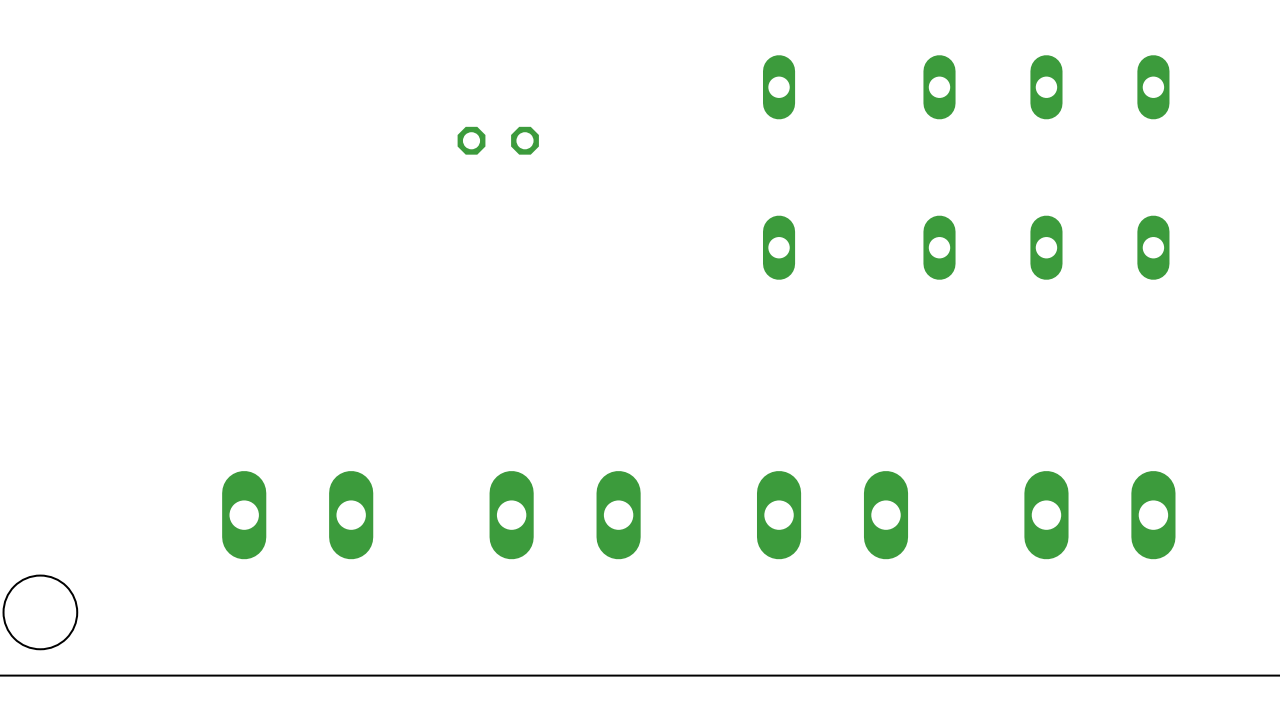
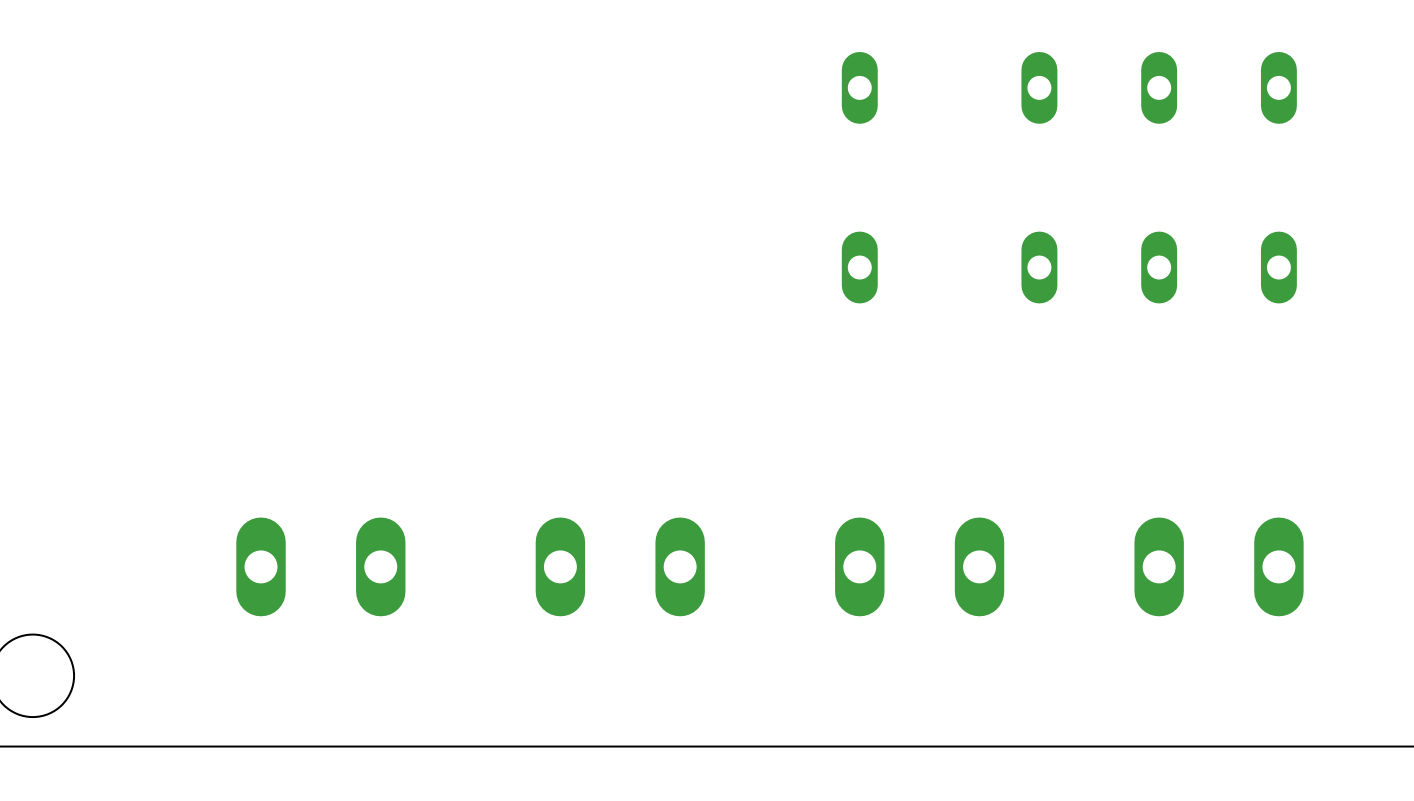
part: (498, 140) -> none

